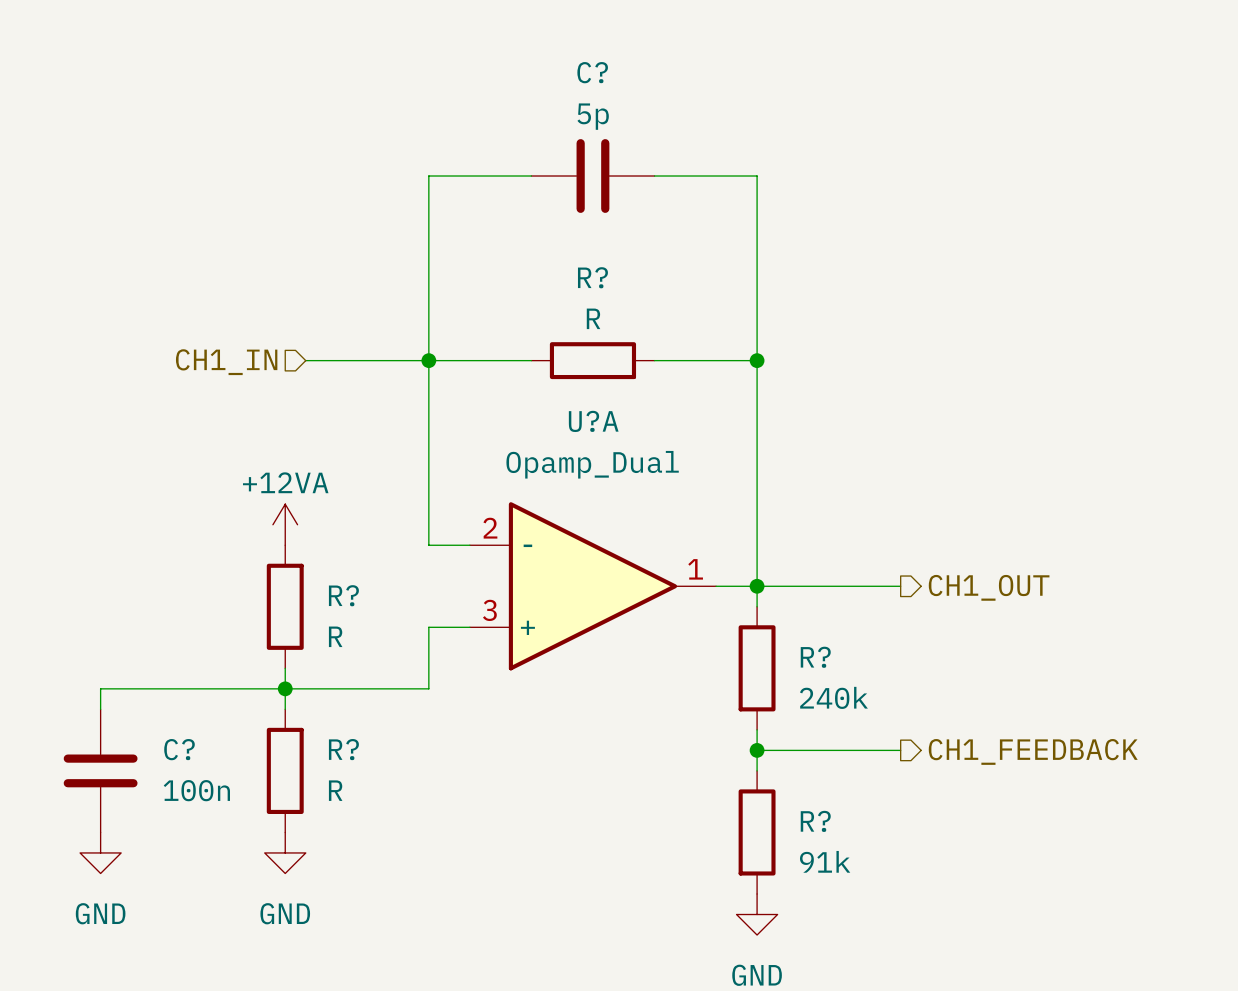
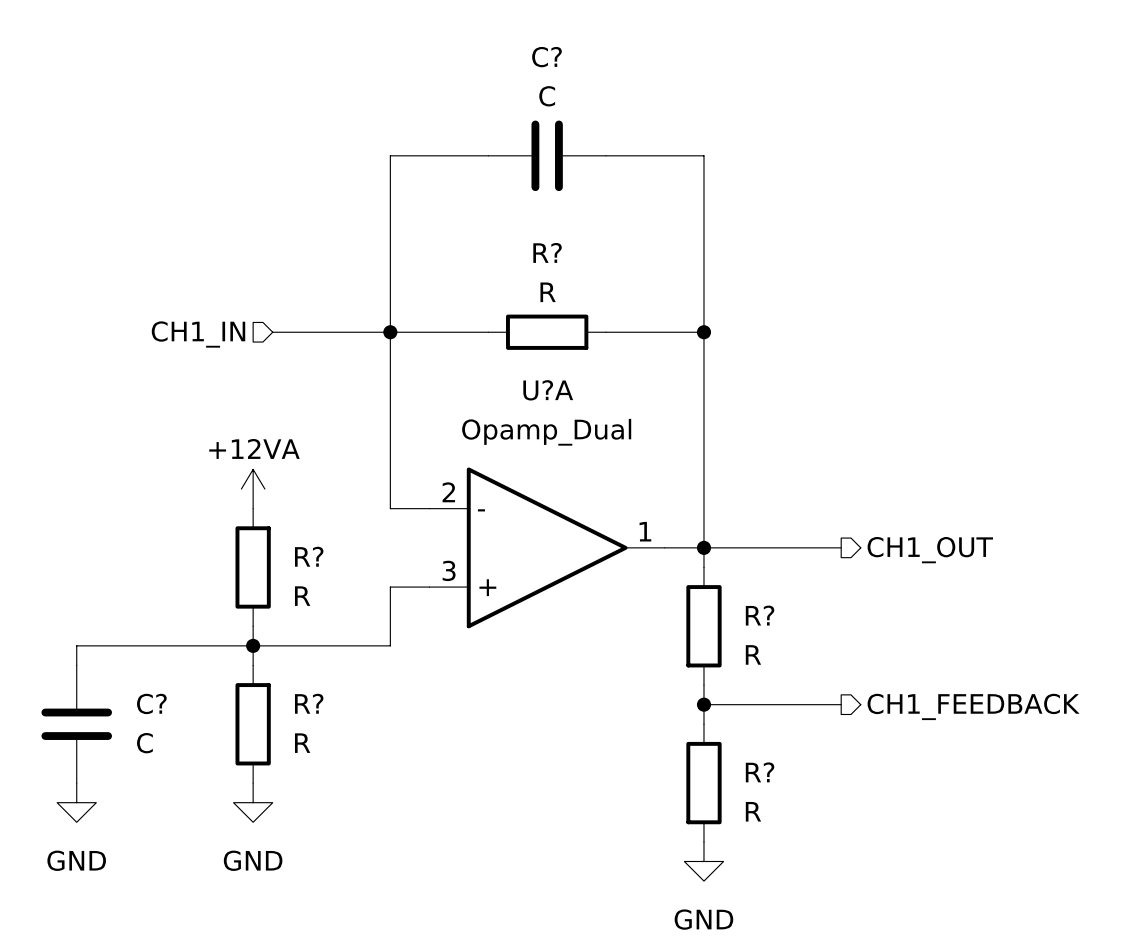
C? value: 5p (593, 116) -> C (547, 96)
R? value: 240k (833, 697) -> R (753, 654)
C? value: 100n (196, 790) -> C (144, 743)
R? value: 91k (825, 861) -> R (753, 811)

